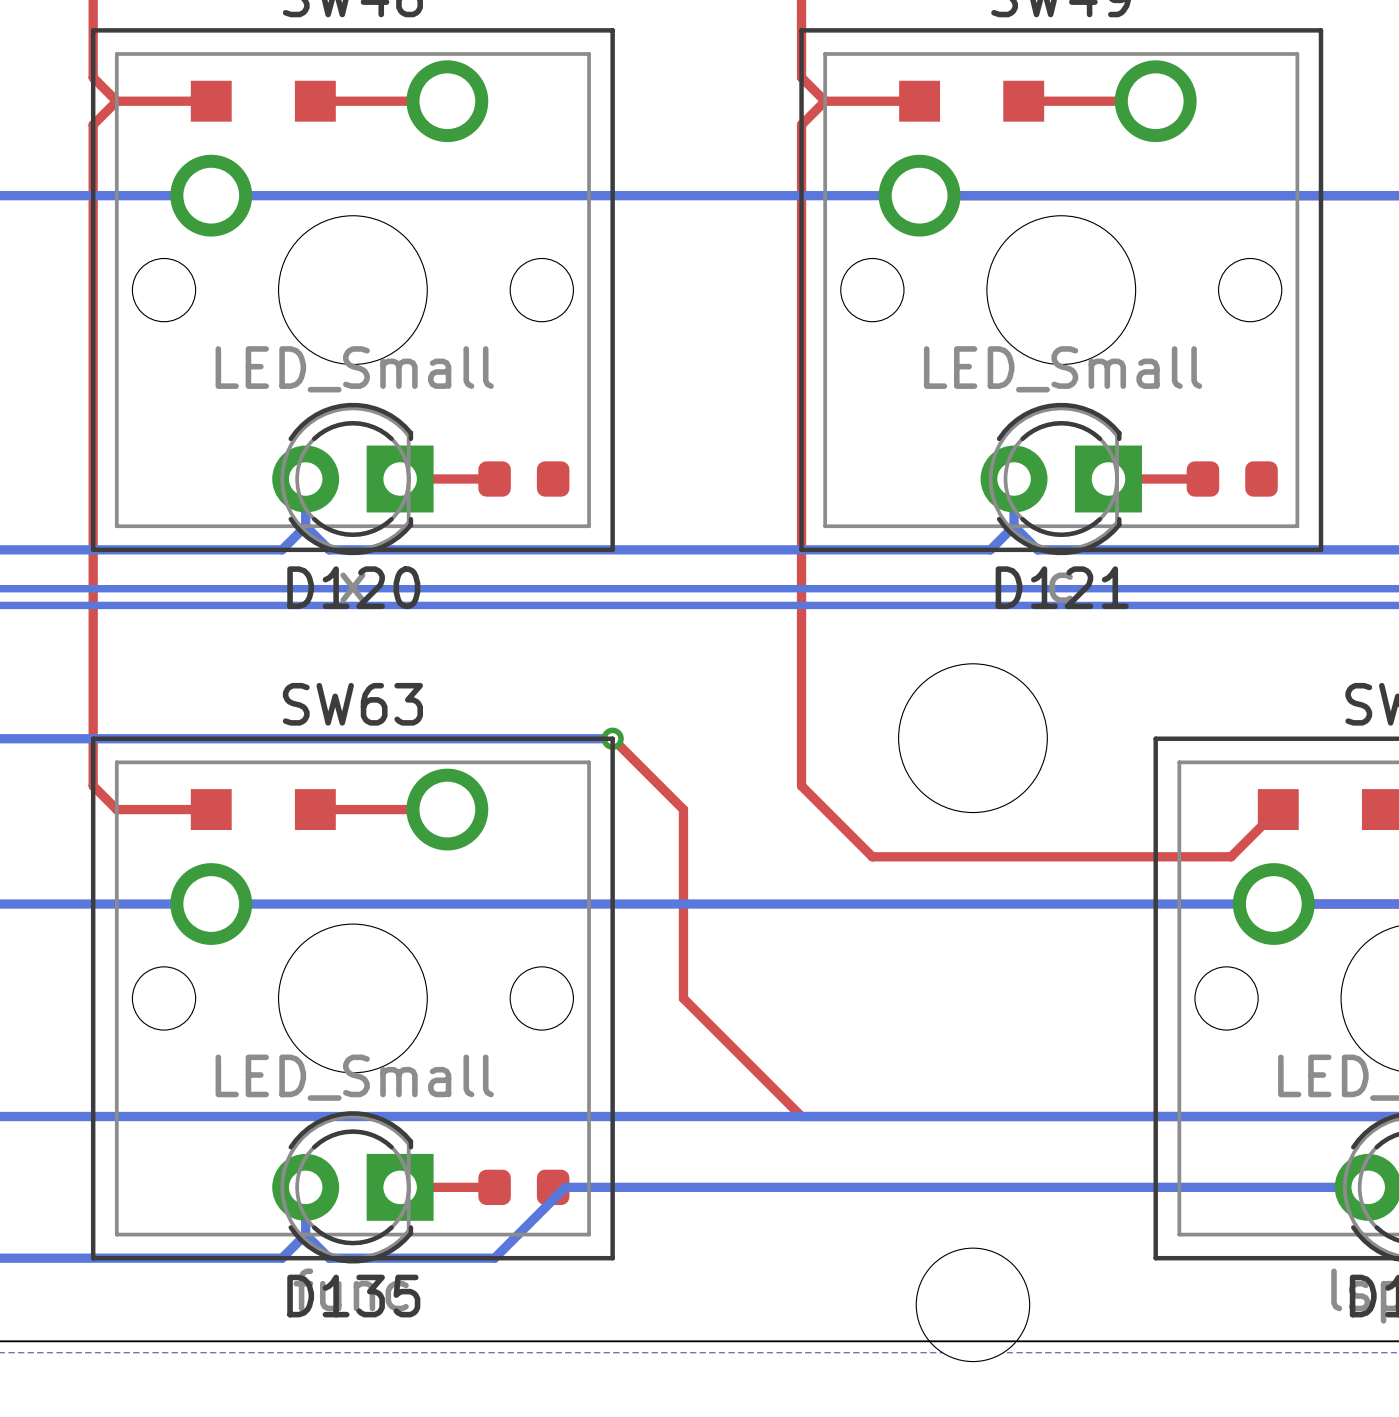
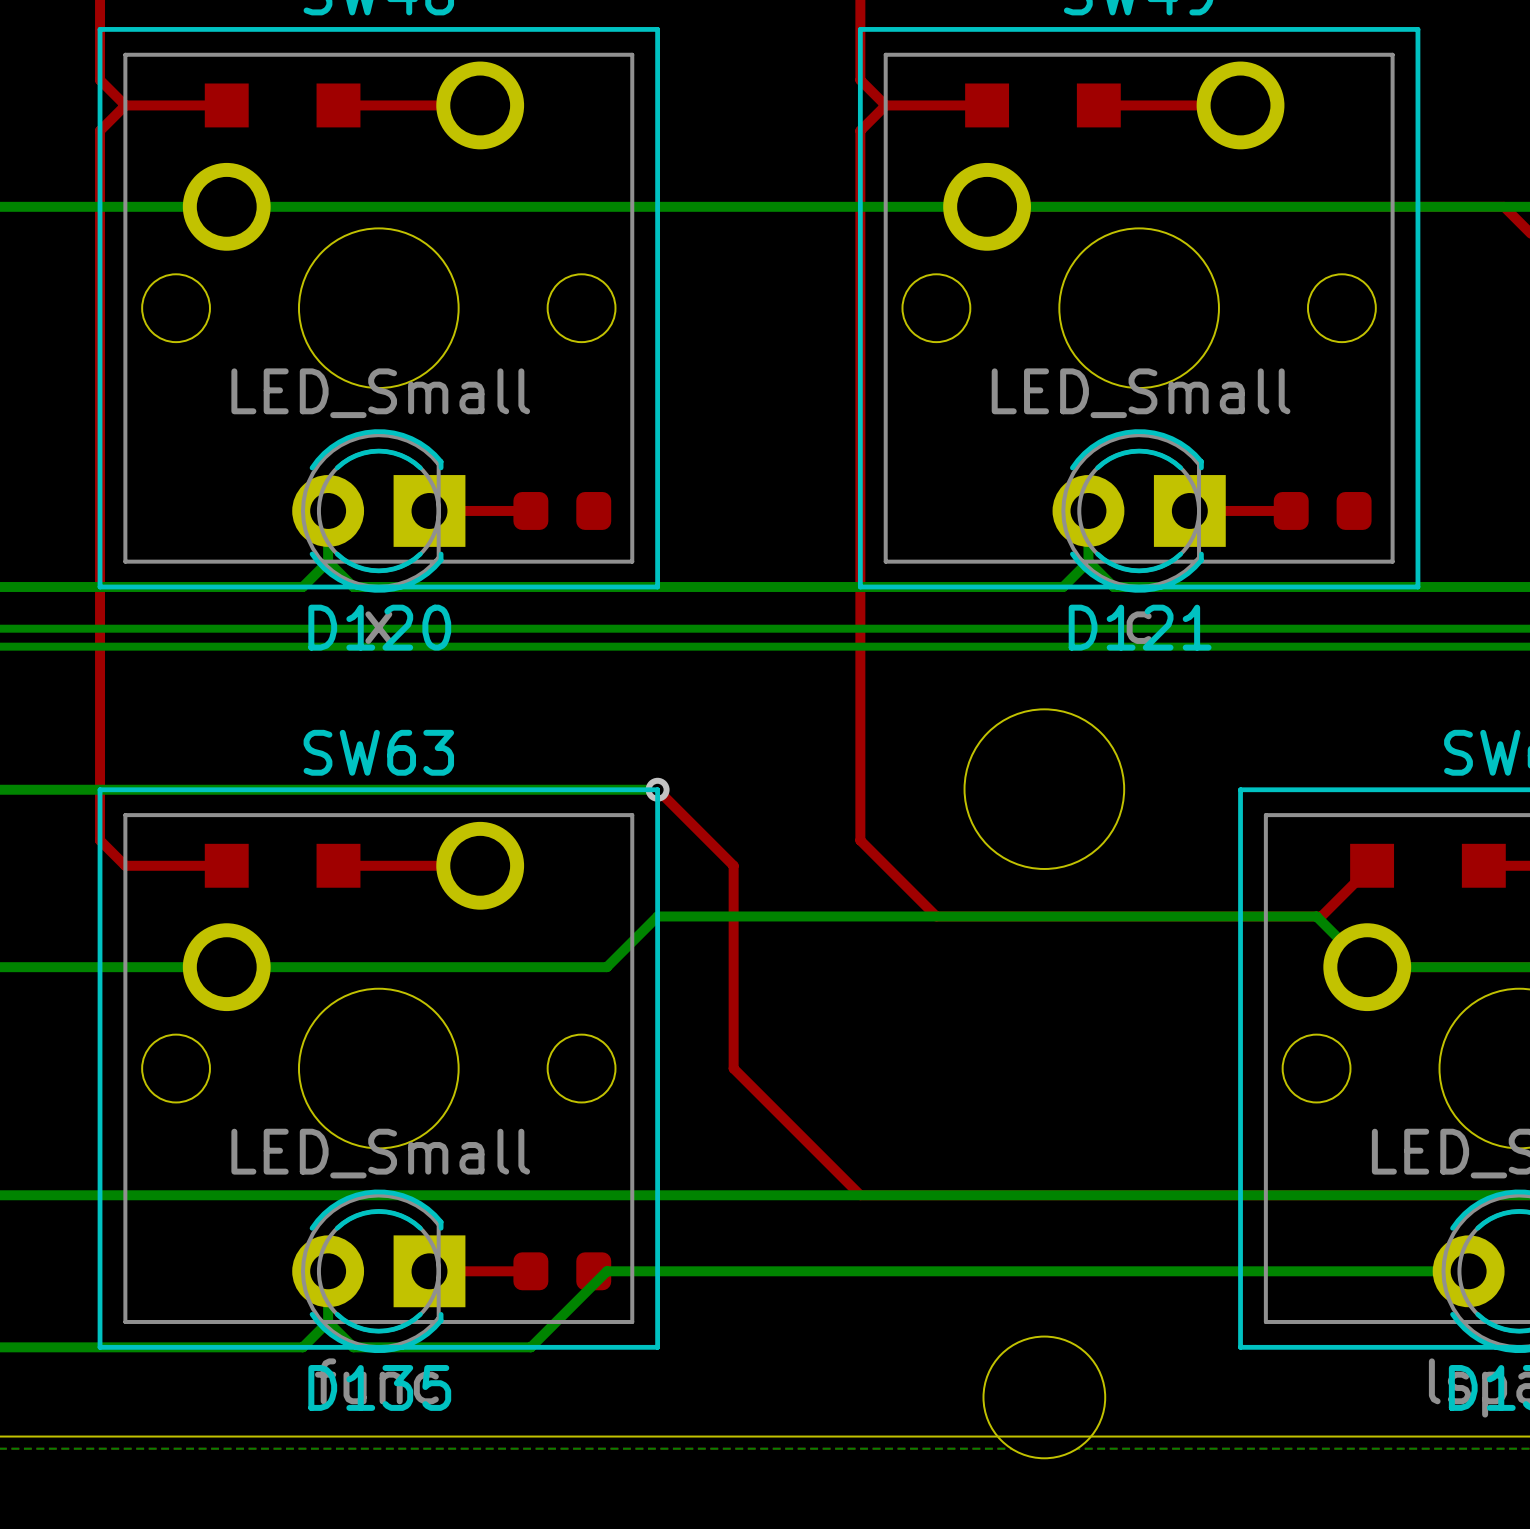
bottom track: (1273, 904) (565, 904) -> (1367, 967) (1316, 916) (657, 916) (606, 967)

